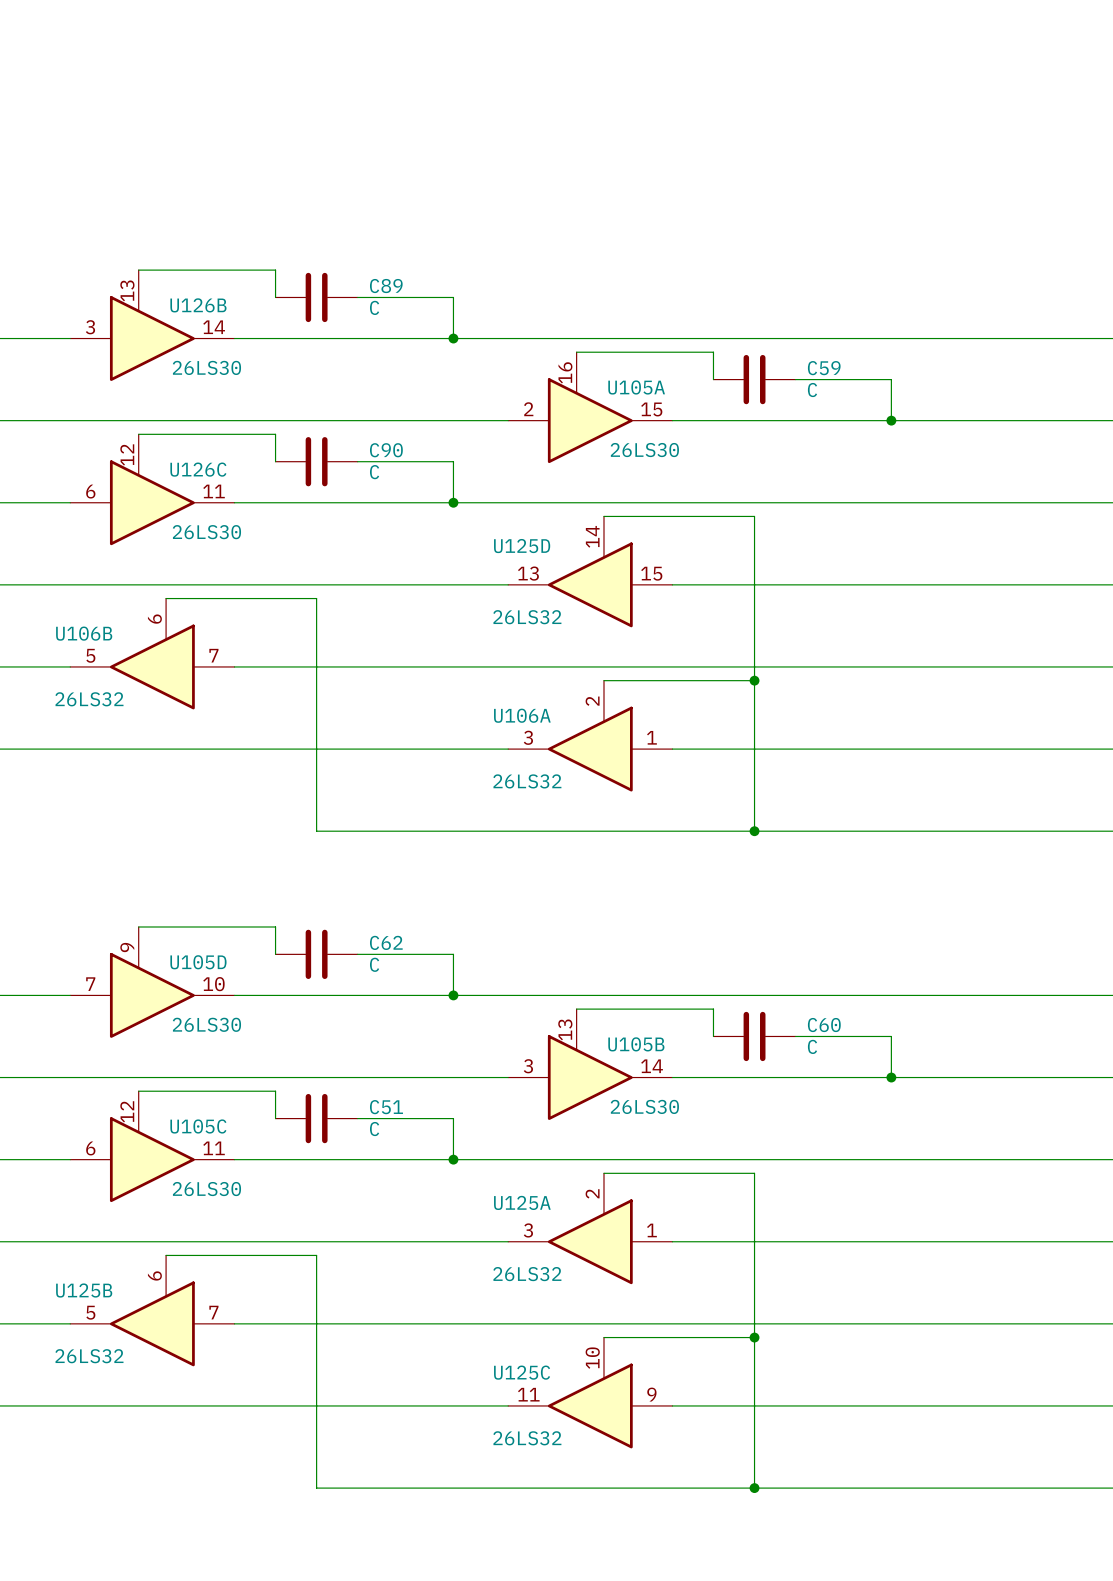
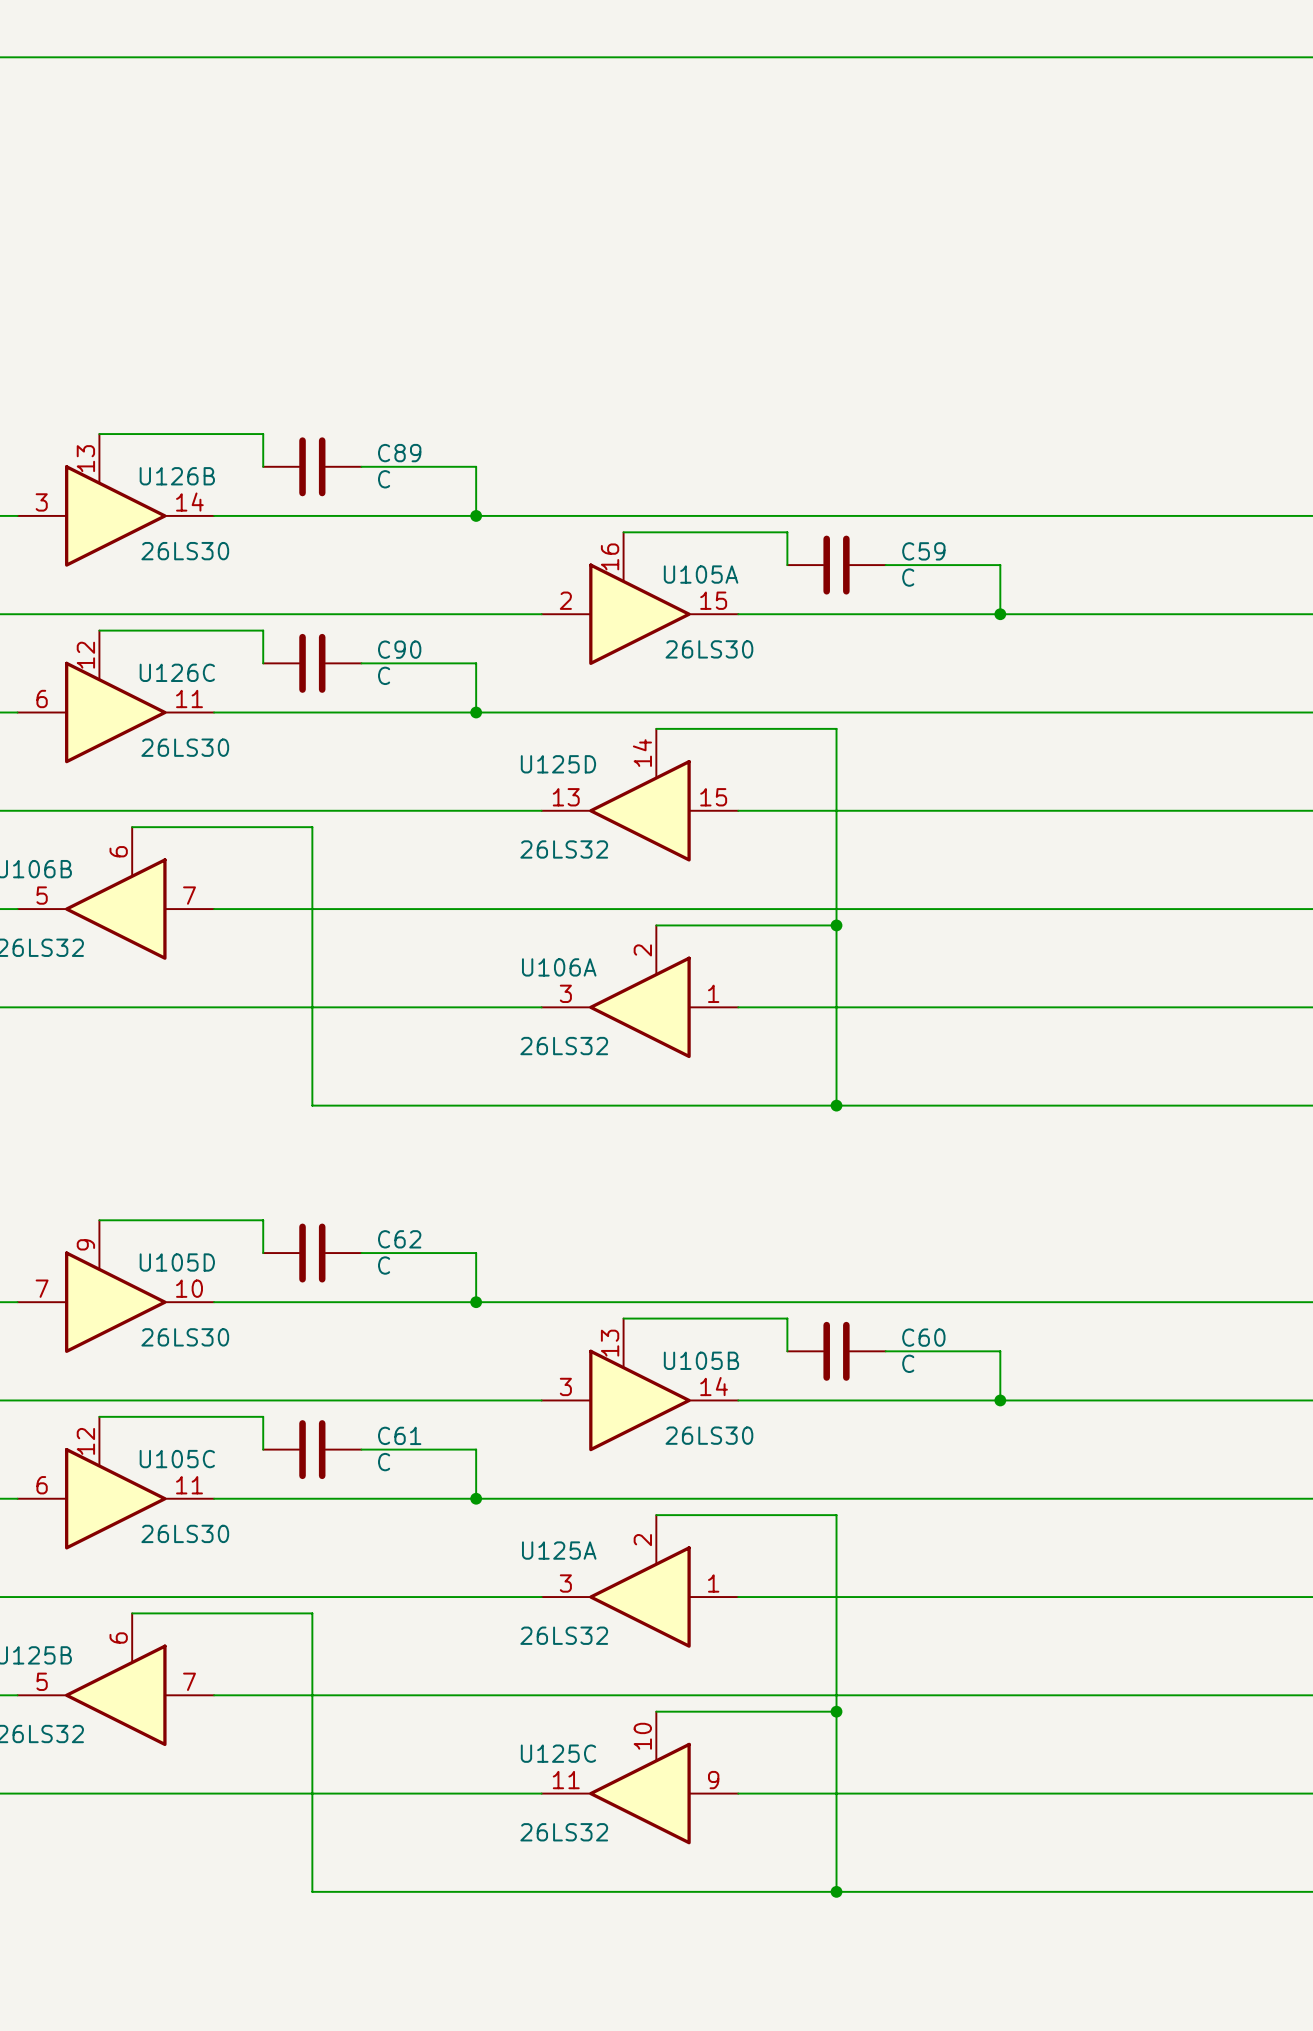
C51 name: C51 (386, 1107) -> C61 (399, 1435)

